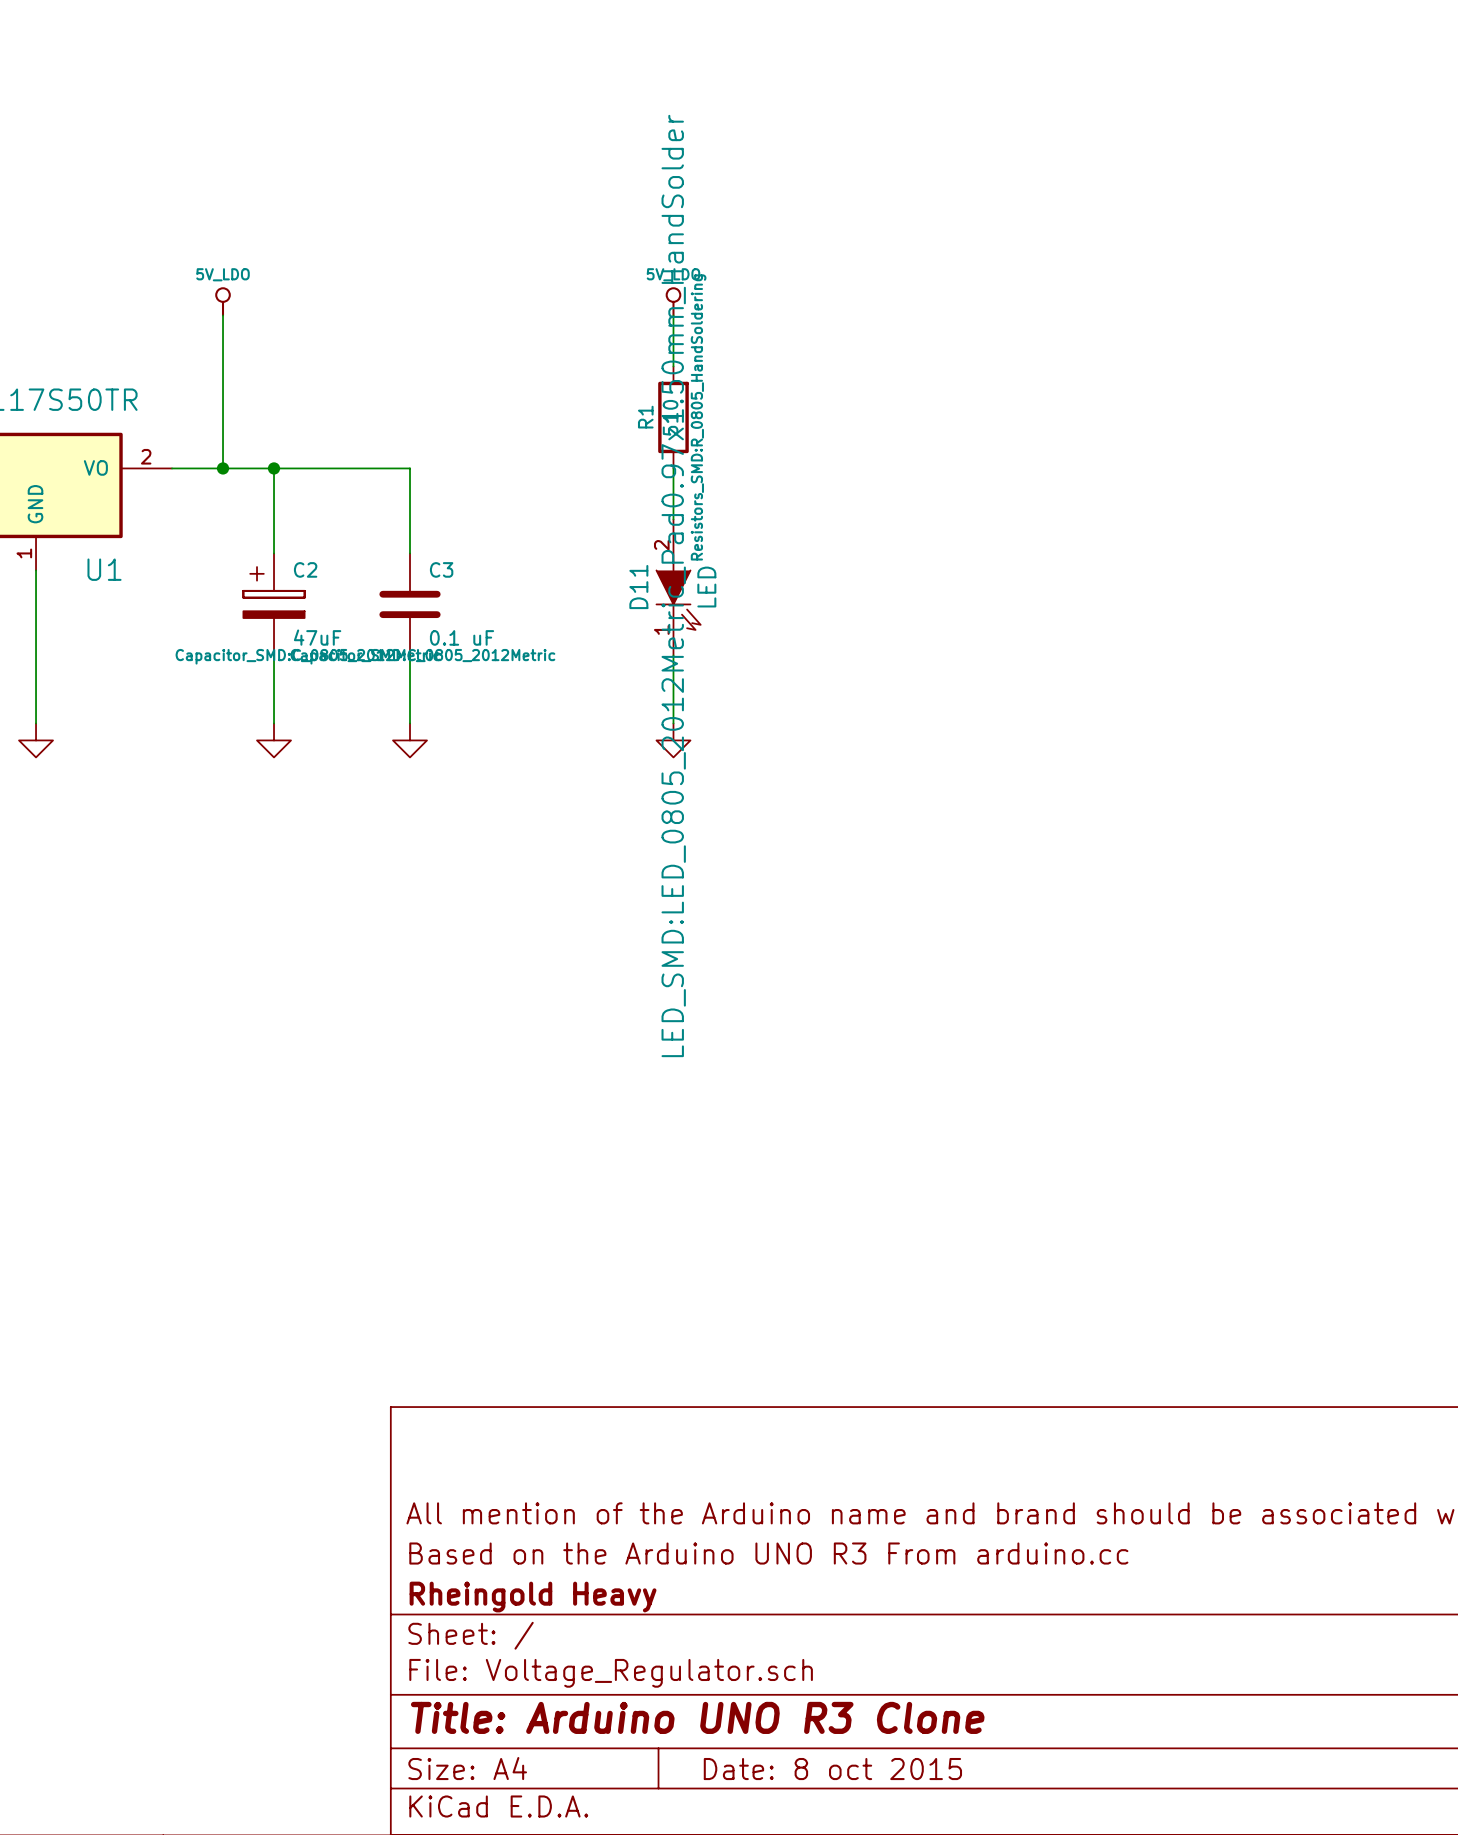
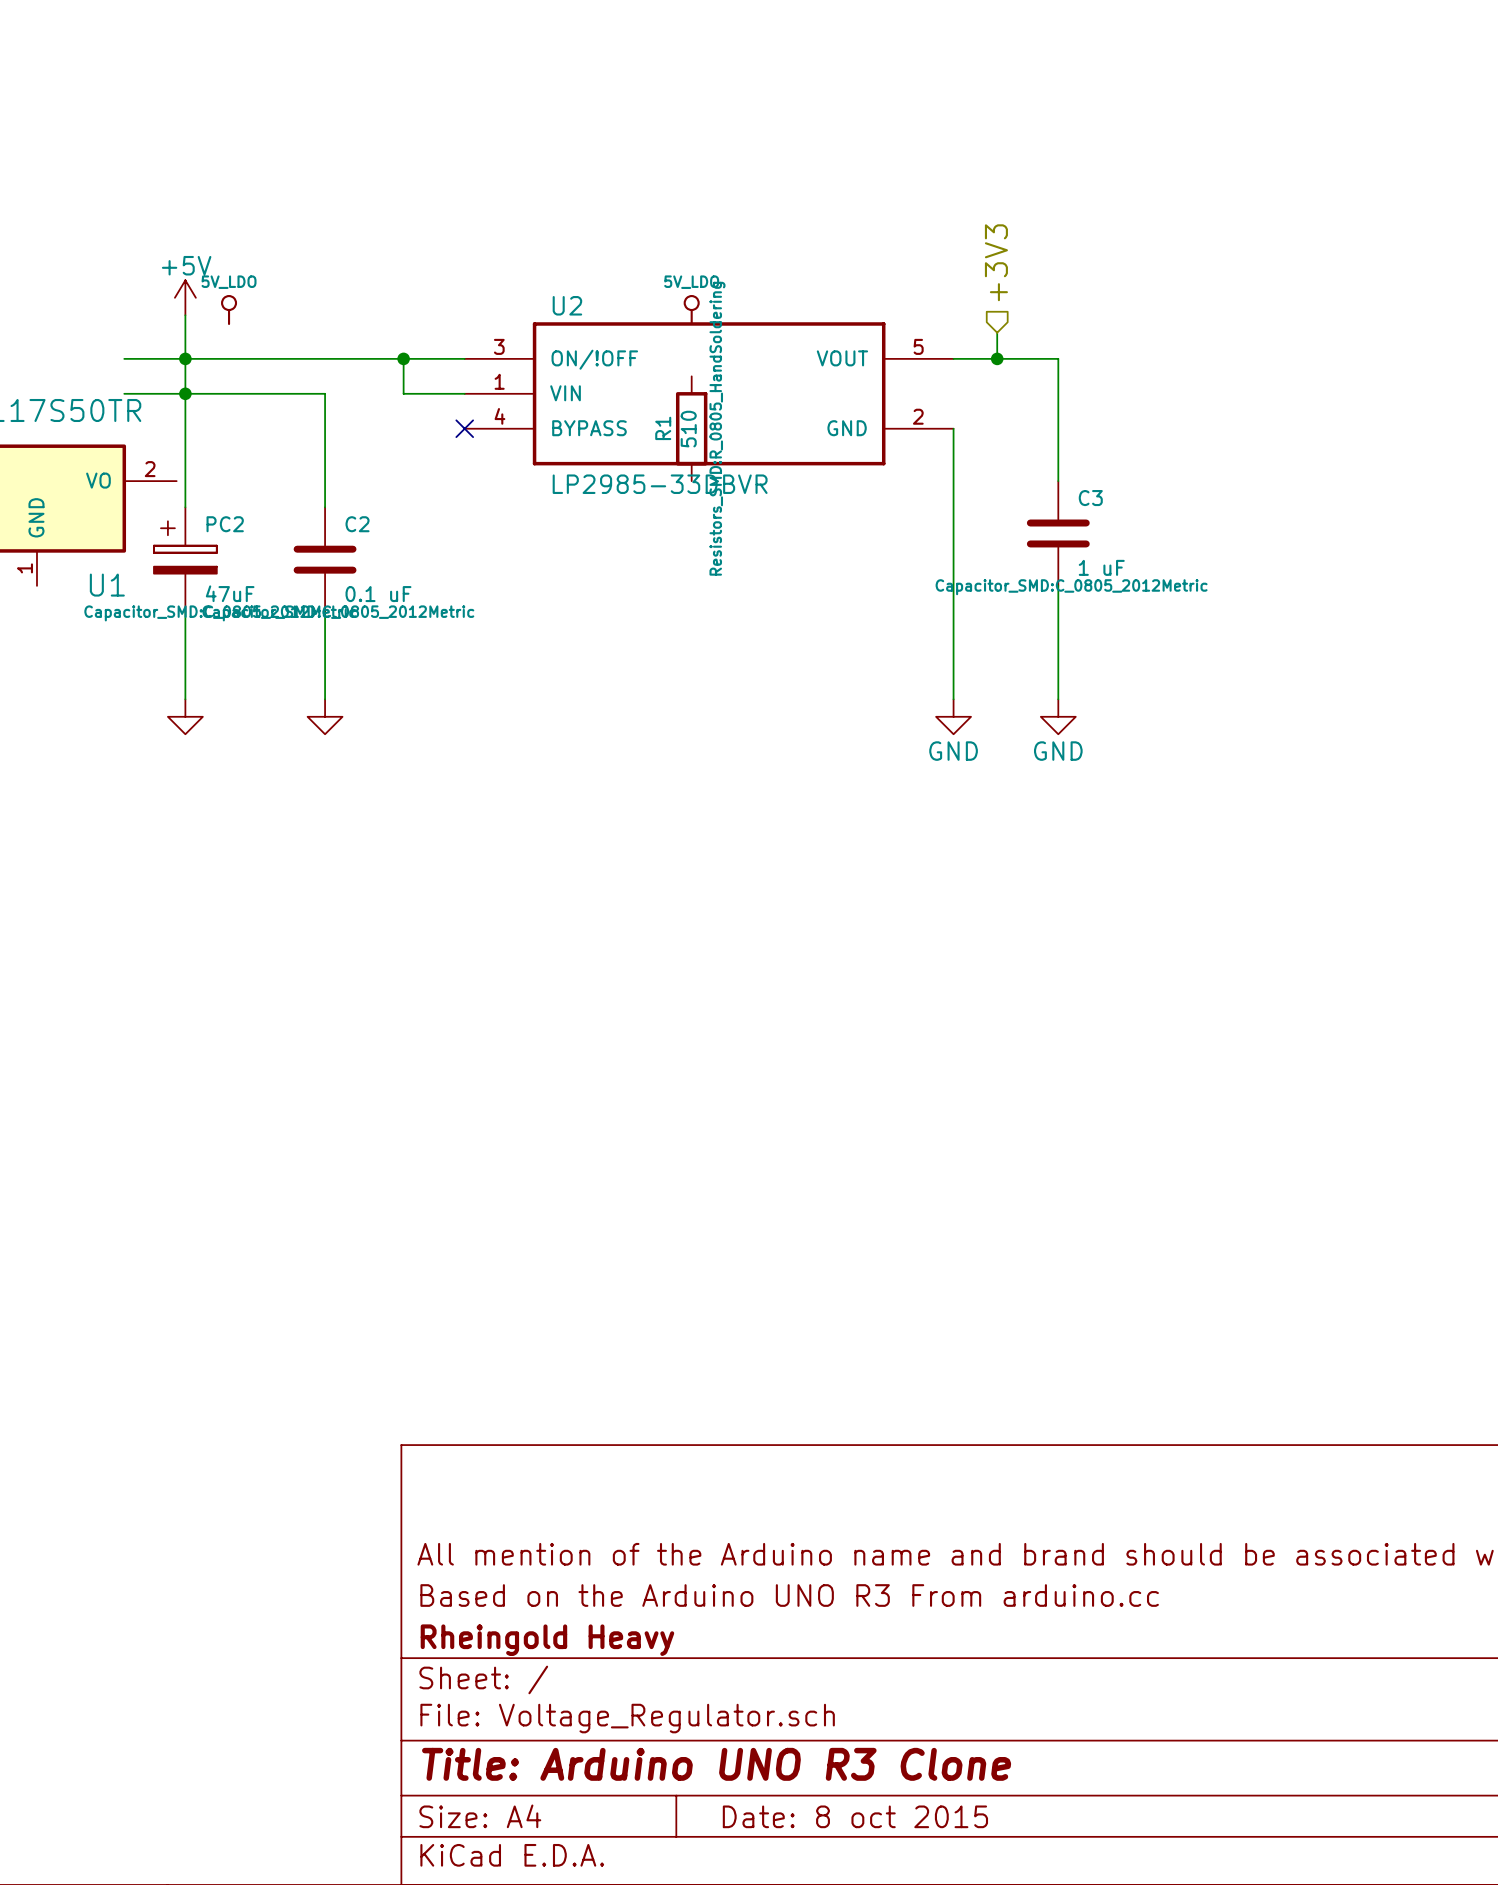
hierarchical label: none -> +3V3 (996, 262)
power symbol: none -> +5V (185, 297)
wire: none -> (185, 315) (185, 507)
wire: (223, 315) (223, 468) -> none
wire: (673, 315) (673, 366) -> none
wire: none -> (997, 332) (997, 358)
wire: none -> (124, 358) (464, 358)
junction: none -> (185, 358)
wire: none -> (403, 358) (403, 393) (464, 393)
junction: none -> (403, 358)
wire: none -> (953, 358) (1058, 358) (1058, 481)
junction: none -> (997, 358)
wire: none -> (124, 393) (325, 393) (325, 507)
junction: none -> (185, 393)
U2: none -> LP2985-33DBVR (709, 393)
no-connect mark: none -> (464, 428)
wire: none -> (953, 428) (953, 699)
wire: (172, 468) (410, 468) (410, 553) -> none
junction: (223, 468) -> none
wire: (274, 468) (274, 553) -> (325, 612) (325, 699)
junction: (274, 468) -> none
wire: (673, 468) (673, 519) -> none
PC2: none -> 47uF (185, 559)
C2 symbol: [243, 553, 305, 656] -> [293, 507, 357, 613]
wire: (36, 570) (36, 723) -> none
wire: none -> (1058, 585) (1058, 699)
D11: LED (678, 587) -> none
wire: none -> (185, 612) (185, 699)
C3 position: (410, 604) -> (1058, 533)
C2 value: 47uF (317, 637) -> 0.1 uF (378, 594)
C3 value: 0.1 uF (462, 637) -> 1 uF (1101, 567)
wire: (274, 655) (274, 723) -> none
wire: (410, 655) (410, 723) -> none
wire: (673, 655) (673, 723) -> none
power symbol: none -> (185, 716)
power symbol: none -> (325, 716)
power symbol: none -> GND (953, 716)
power symbol: none -> GND (1058, 716)
power symbol: (36, 740) -> none
power symbol: (274, 740) -> none
power symbol: (410, 740) -> none
power symbol: (673, 740) -> none

